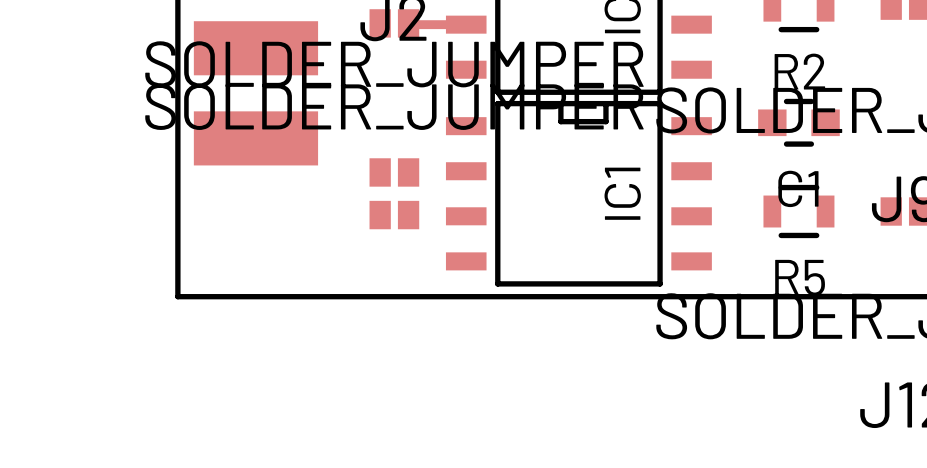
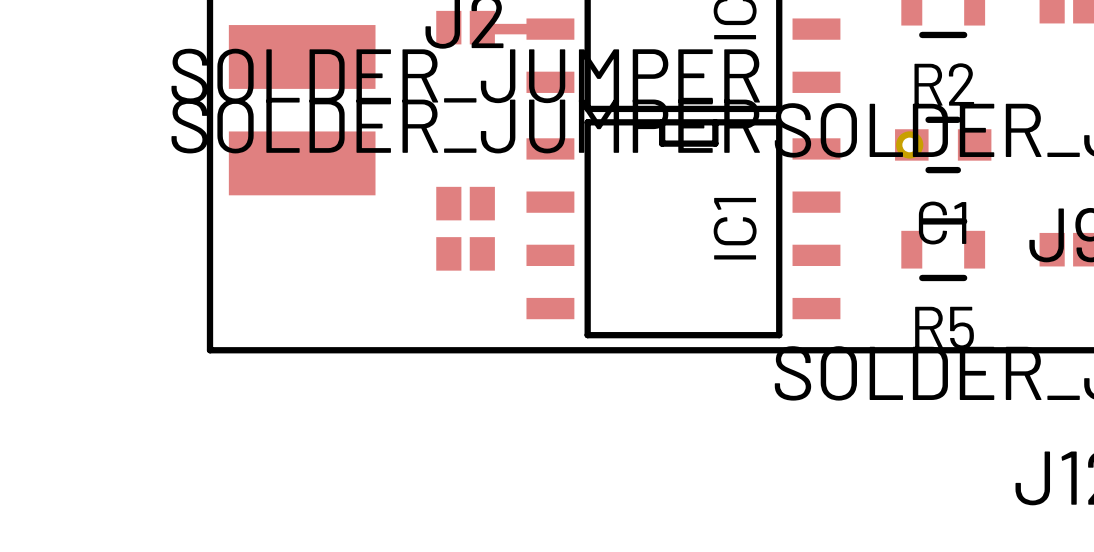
part: none -> (909, 144)

